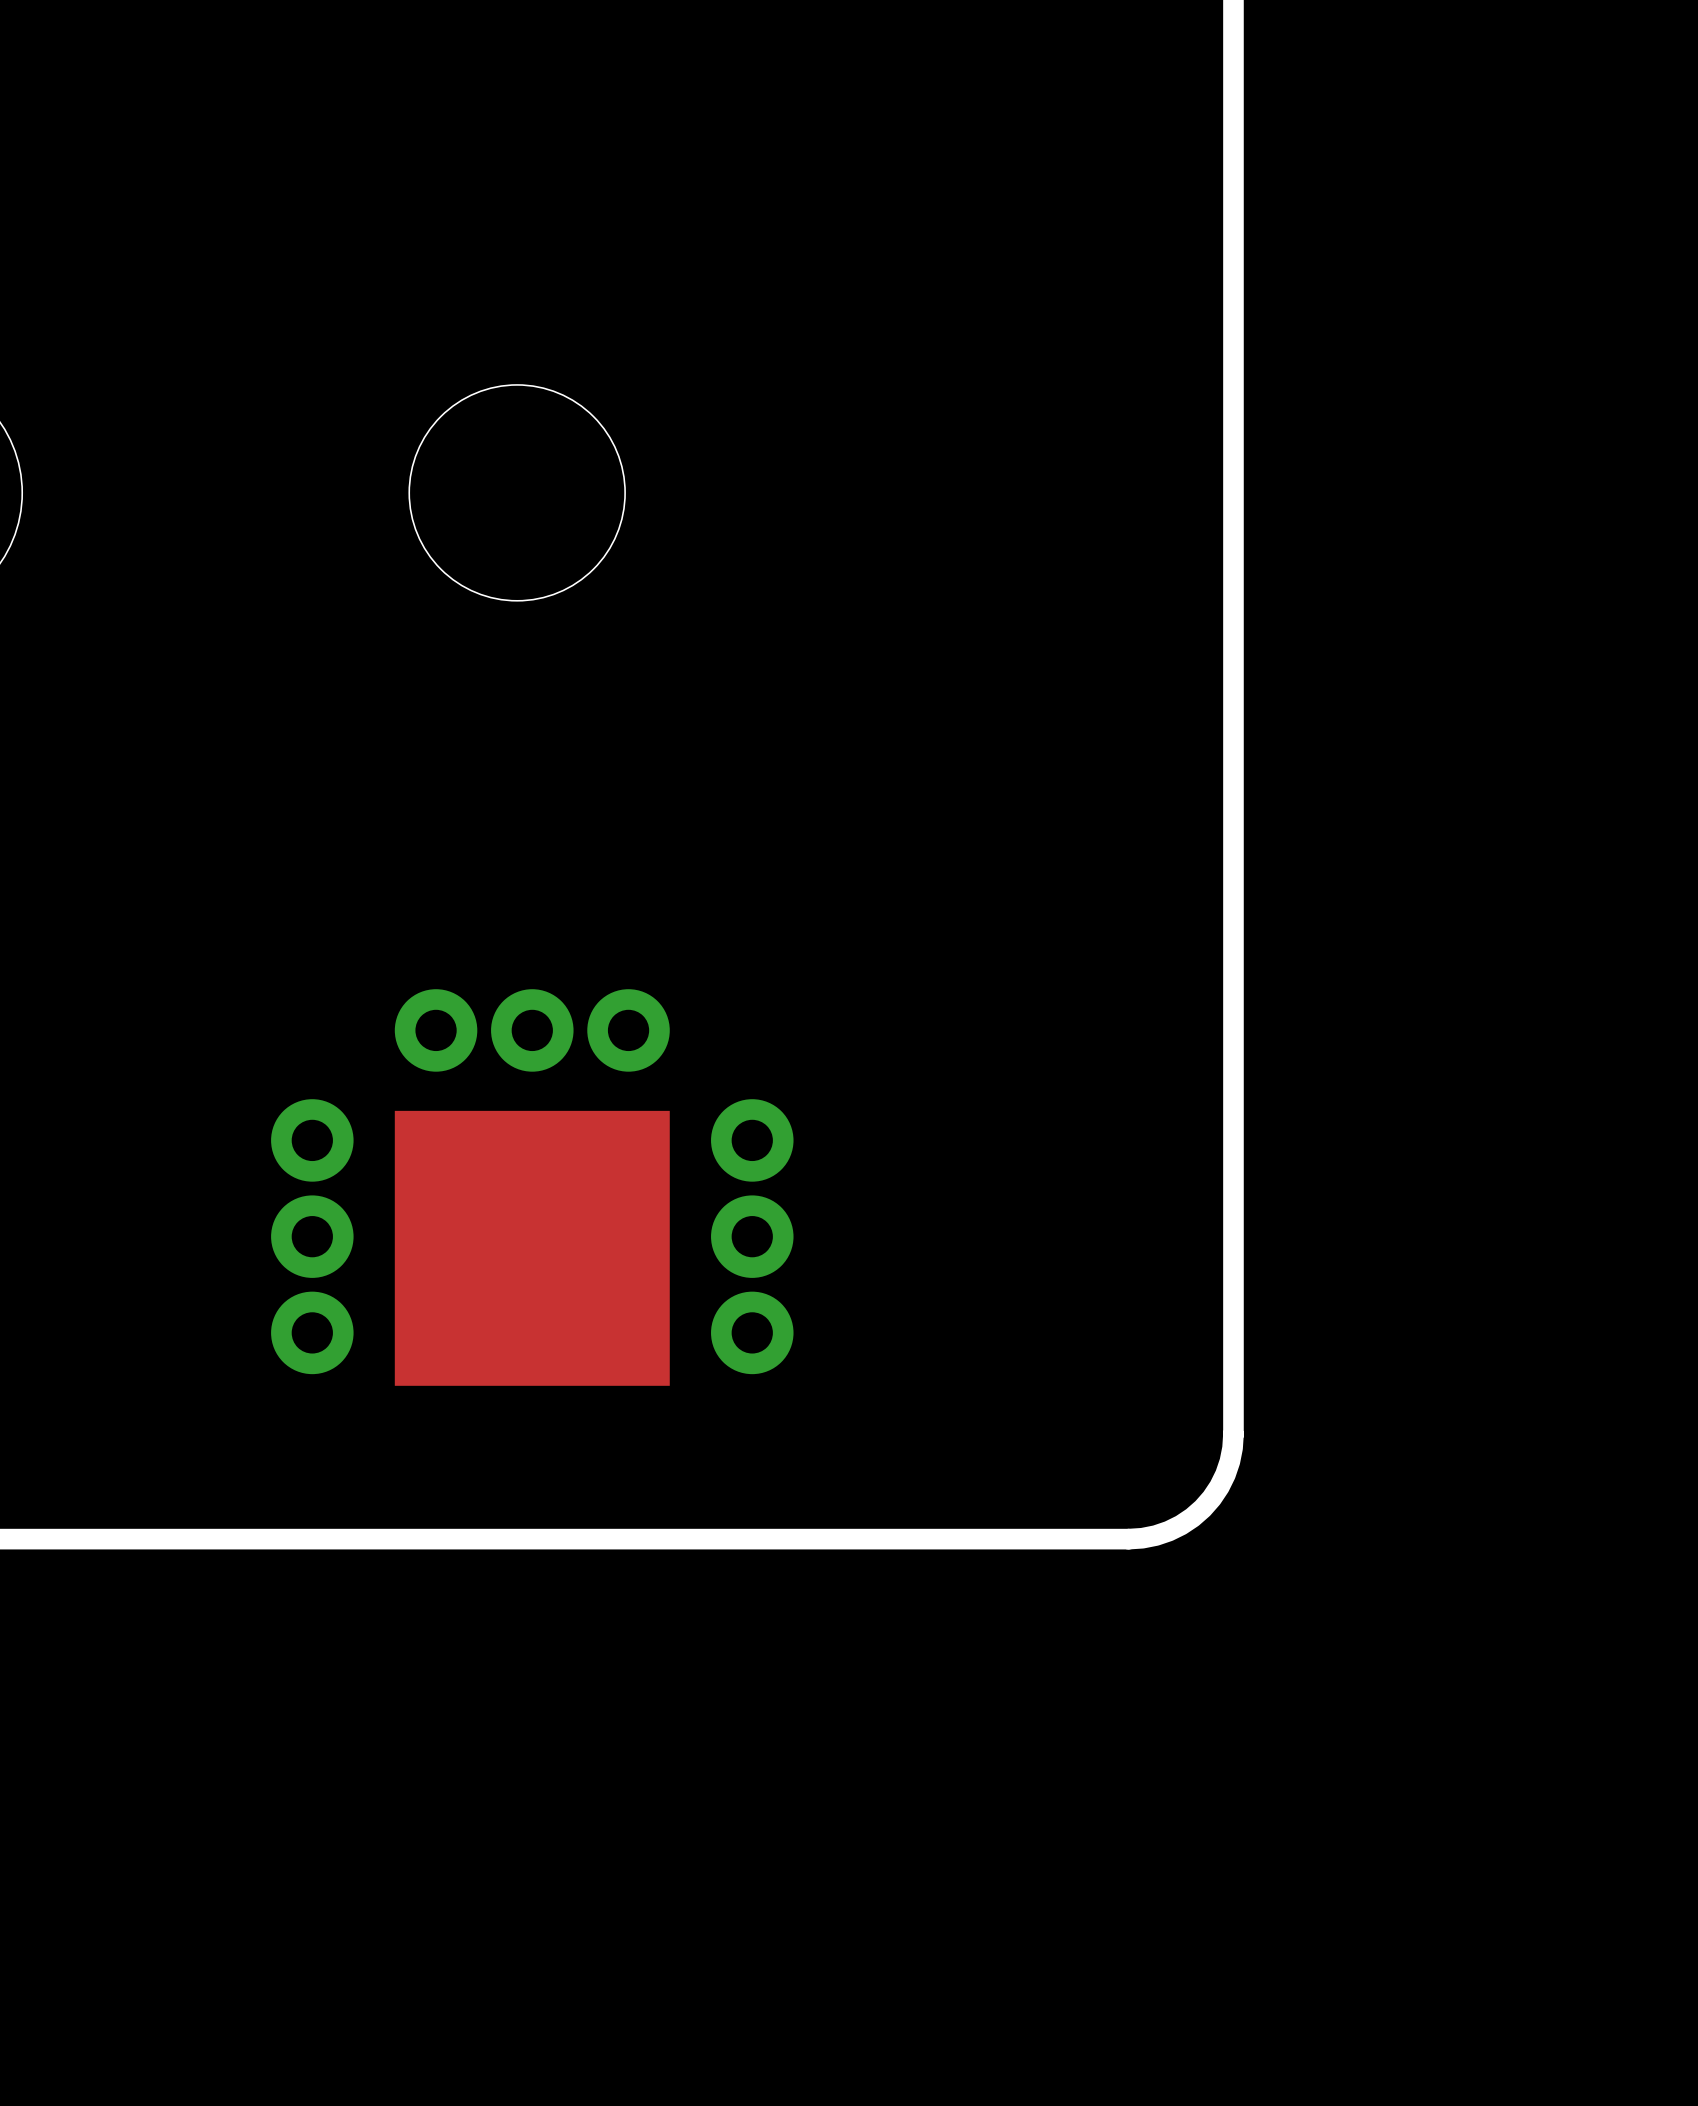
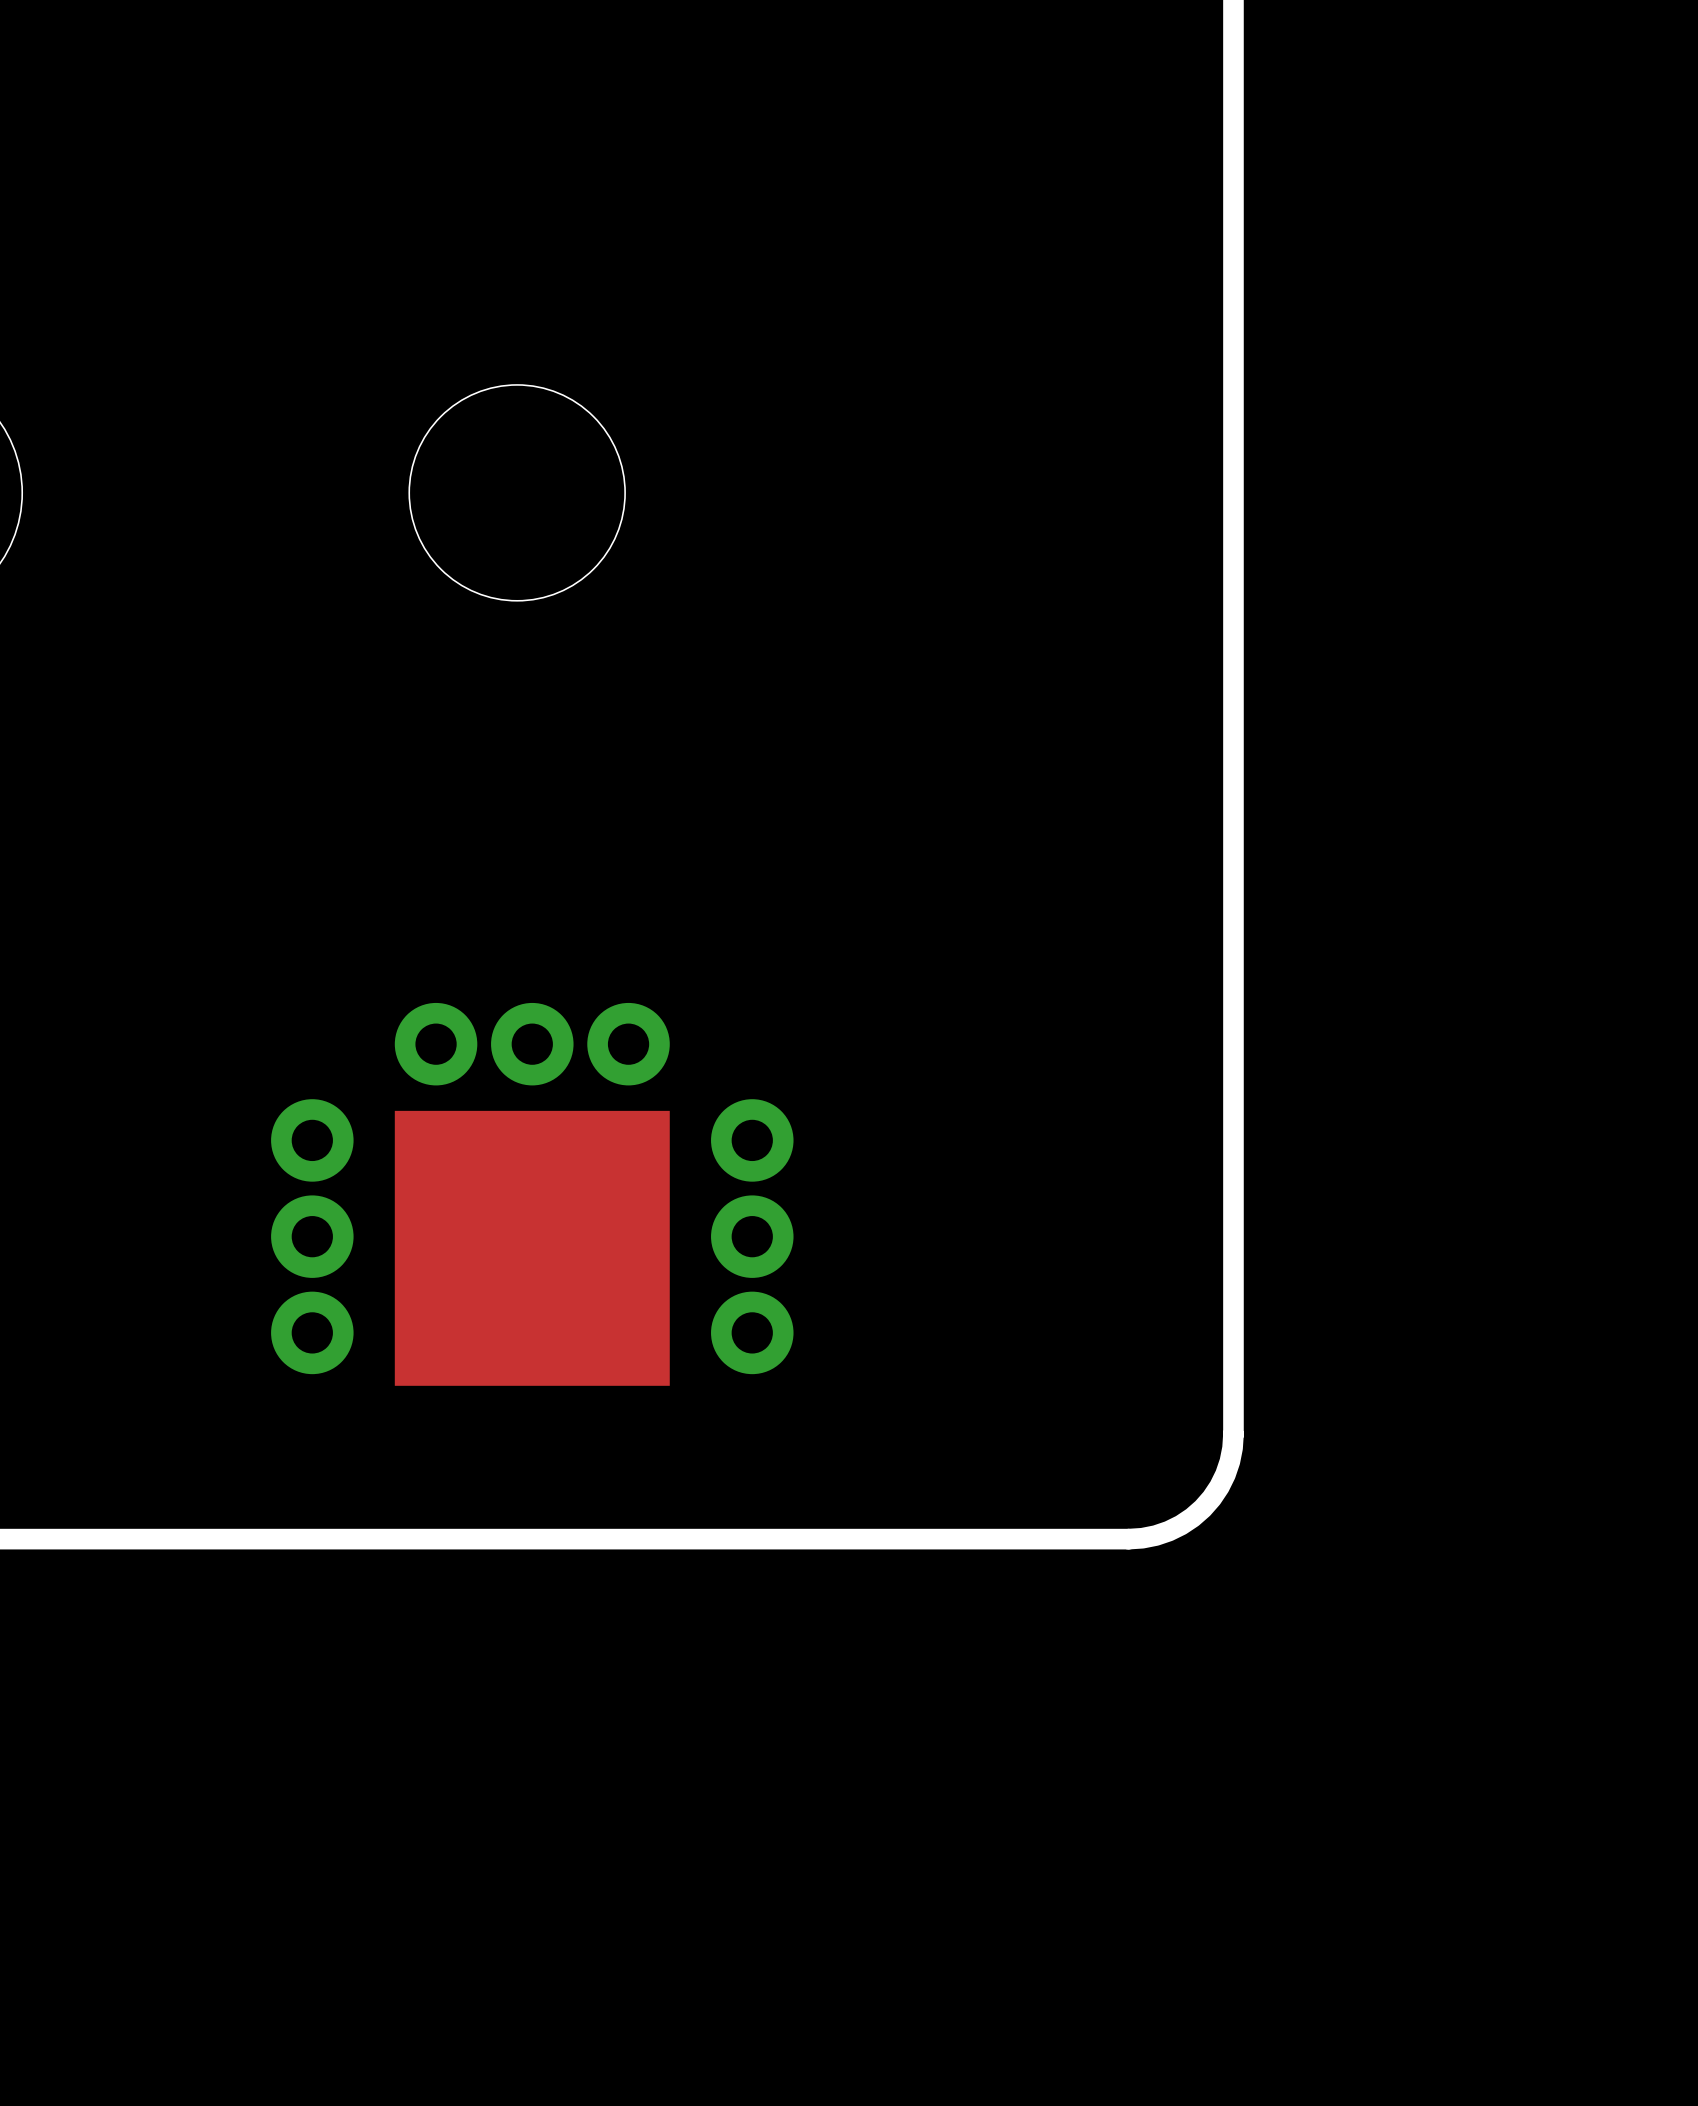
via position: (436, 1030) -> (436, 1044)
via position: (532, 1030) -> (532, 1044)
via position: (628, 1030) -> (628, 1044)

